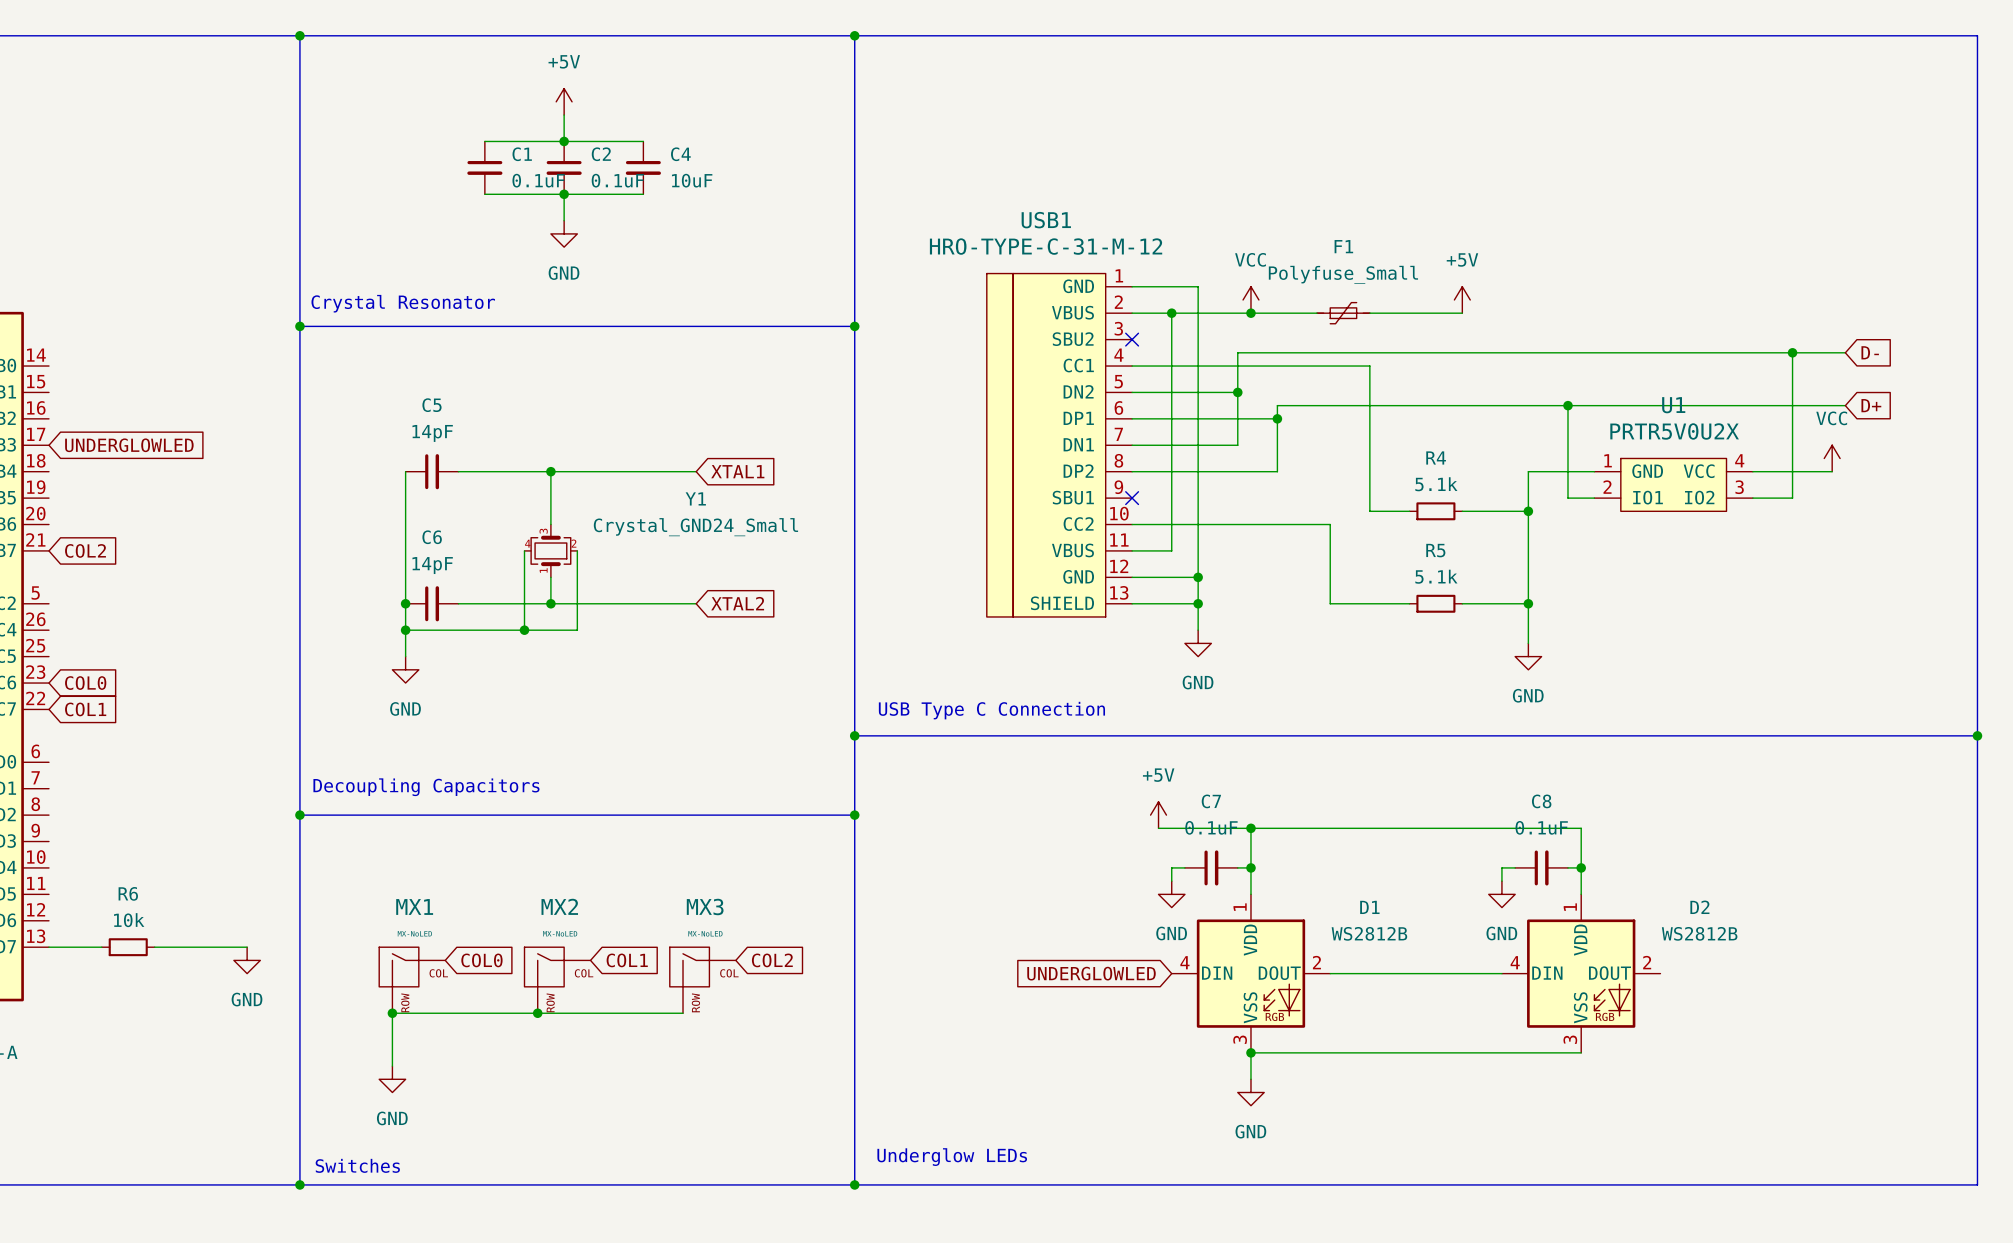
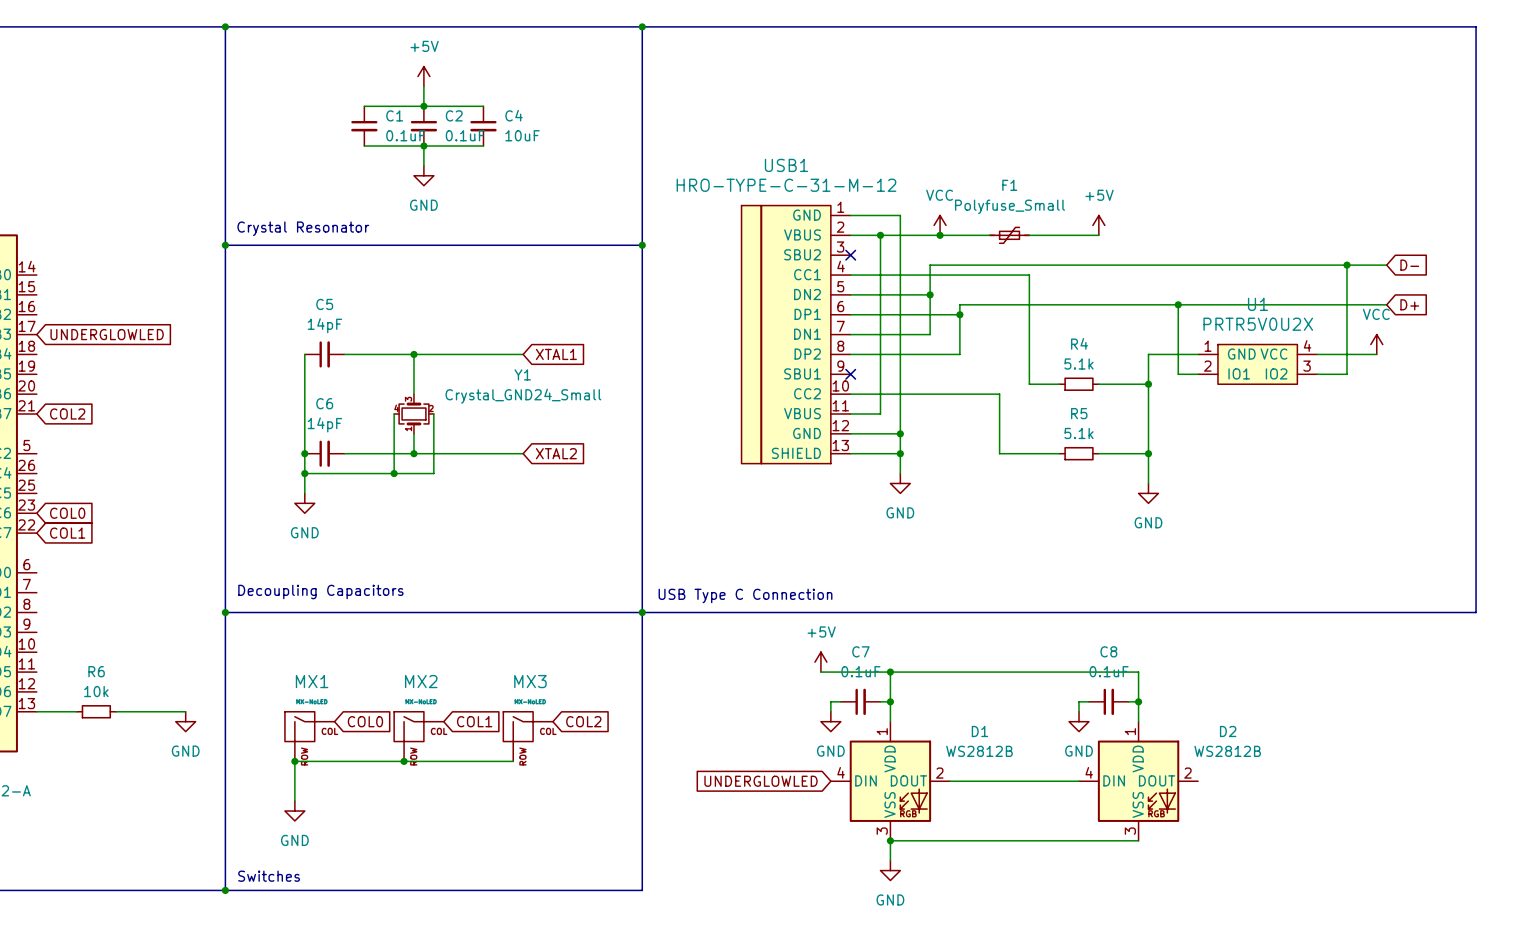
bus: (1964, 35) (1977, 35) (1977, 1184) (854, 1184) -> (1476, 26) (1476, 612) (642, 612)
text position: USB Type C Connection (991, 710) -> USB Type C Connection (745, 595)
bus: (854, 735) (1977, 735) -> none
junction: (854, 735) -> none
junction: (1977, 735) -> none
power symbol position: +5V (1158, 815) -> +5V (820, 662)
wire: (1158, 828) (1581, 828) (1581, 894) -> (820, 672) (1138, 672) (1138, 721)
wire: (1250, 828) (1250, 894) -> (890, 672) (890, 721)
junction: (1250, 828) -> none
wire: (1184, 867) (1171, 867) (1171, 881) -> (840, 701) (830, 701) (830, 711)
C7 position: (1211, 867) -> (860, 701)
wire: (1237, 867) (1250, 867) -> (880, 701) (890, 701)
junction: (1250, 867) -> none
wire: (1515, 867) (1501, 867) (1501, 881) -> (1088, 701) (1079, 701) (1079, 711)
C8 position: (1541, 867) -> (1108, 701)
wire: (1567, 867) (1581, 867) -> (1128, 701) (1138, 701)
junction: (1581, 867) -> none
power symbol position: GND (1171, 894) -> GND (830, 721)
junction: none -> (890, 672)
power symbol position: GND (1501, 894) -> GND (1079, 721)
junction: none -> (890, 701)
junction: none -> (1138, 701)
global label position: UNDERGLOWLED (1091, 973) -> UNDERGLOWLED (761, 781)
D1 position: (1250, 973) -> (890, 781)
wire: (1330, 973) (1501, 973) -> (949, 781) (1079, 781)
D2 position: (1581, 973) -> (1138, 781)
junction: (1250, 1052) -> none
wire: (1581, 1052) (1250, 1052) (1250, 1079) -> (1138, 840) (890, 840) (890, 860)
power symbol position: GND (1250, 1092) -> GND (890, 870)
junction: none -> (890, 840)
text: Underglow LEDs (952, 1157) -> none
junction: (854, 1184) -> none

